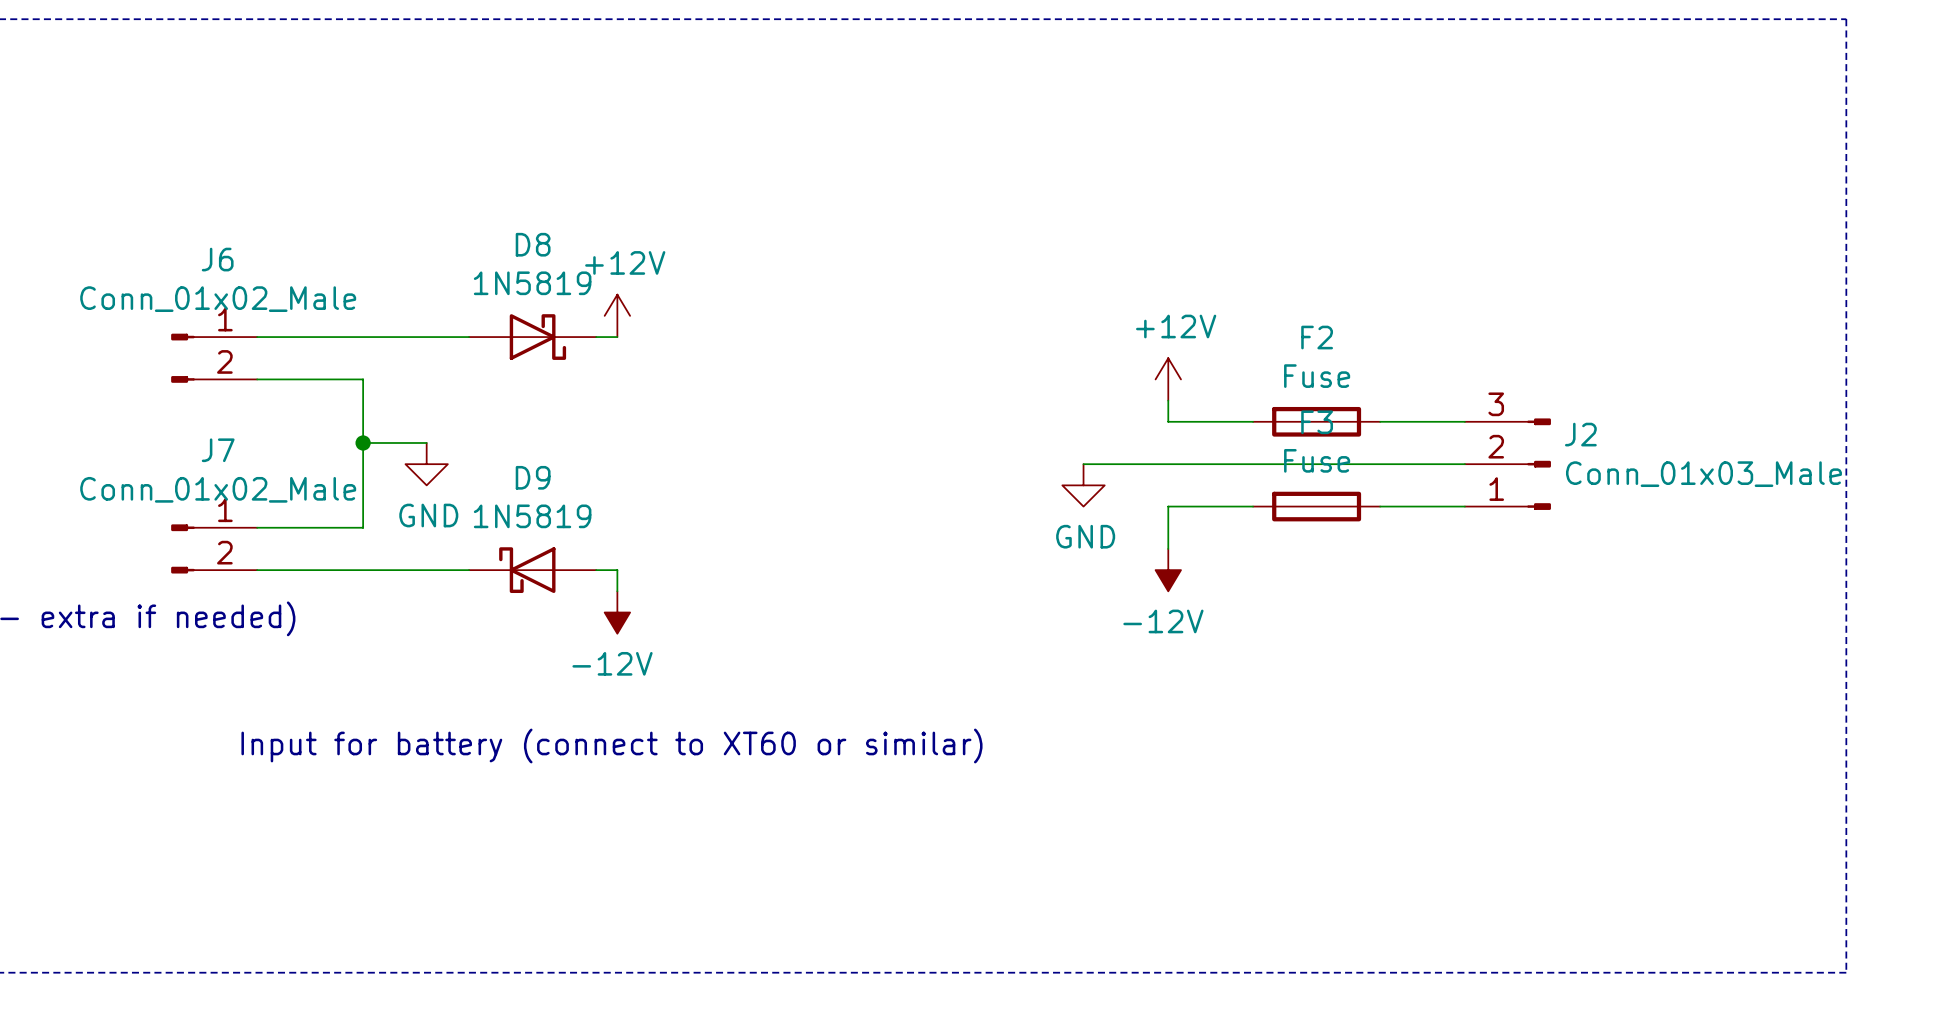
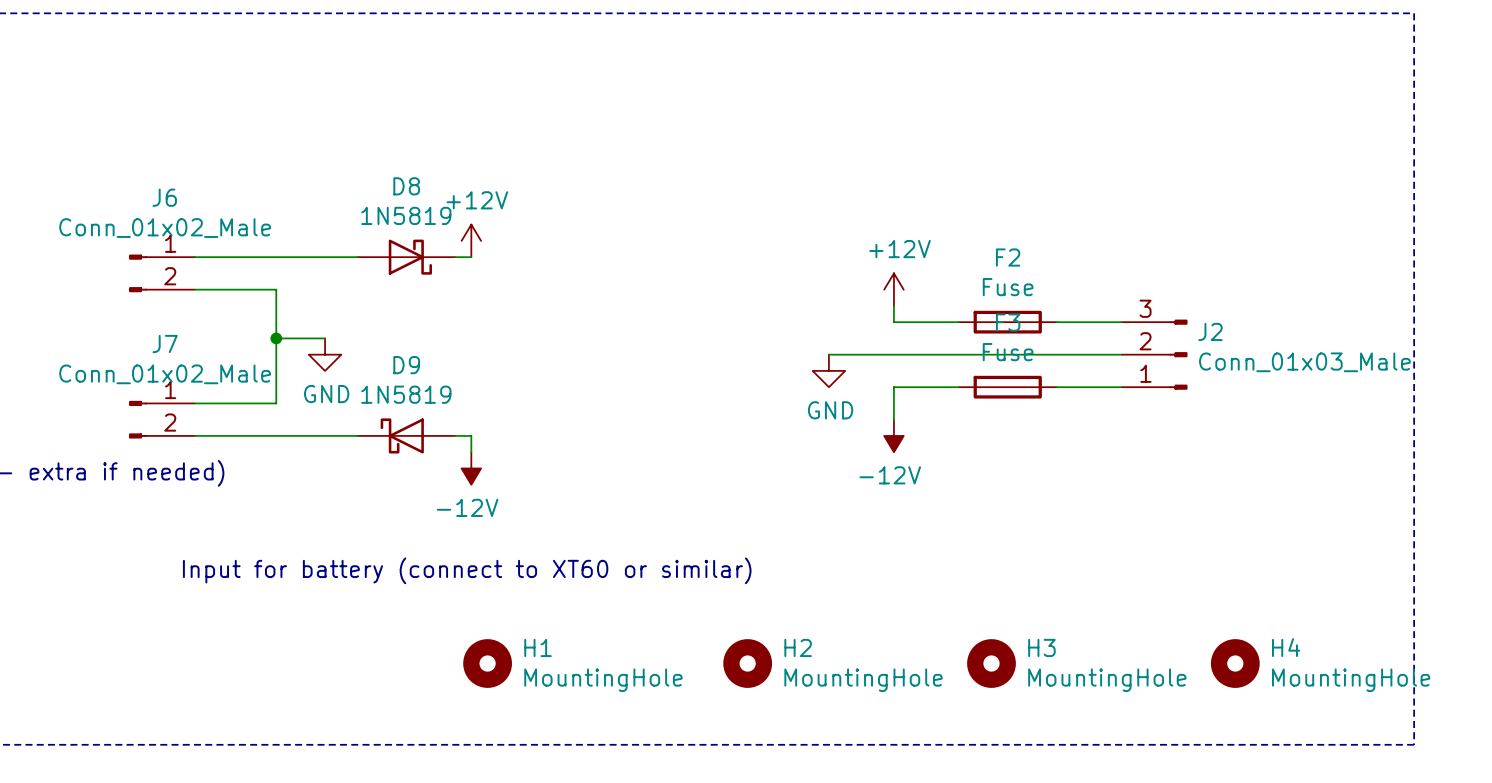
H1: none -> MountingHole (487, 663)
H2: none -> MountingHole (747, 663)
H3: none -> MountingHole (991, 663)
H4: none -> MountingHole (1235, 663)

